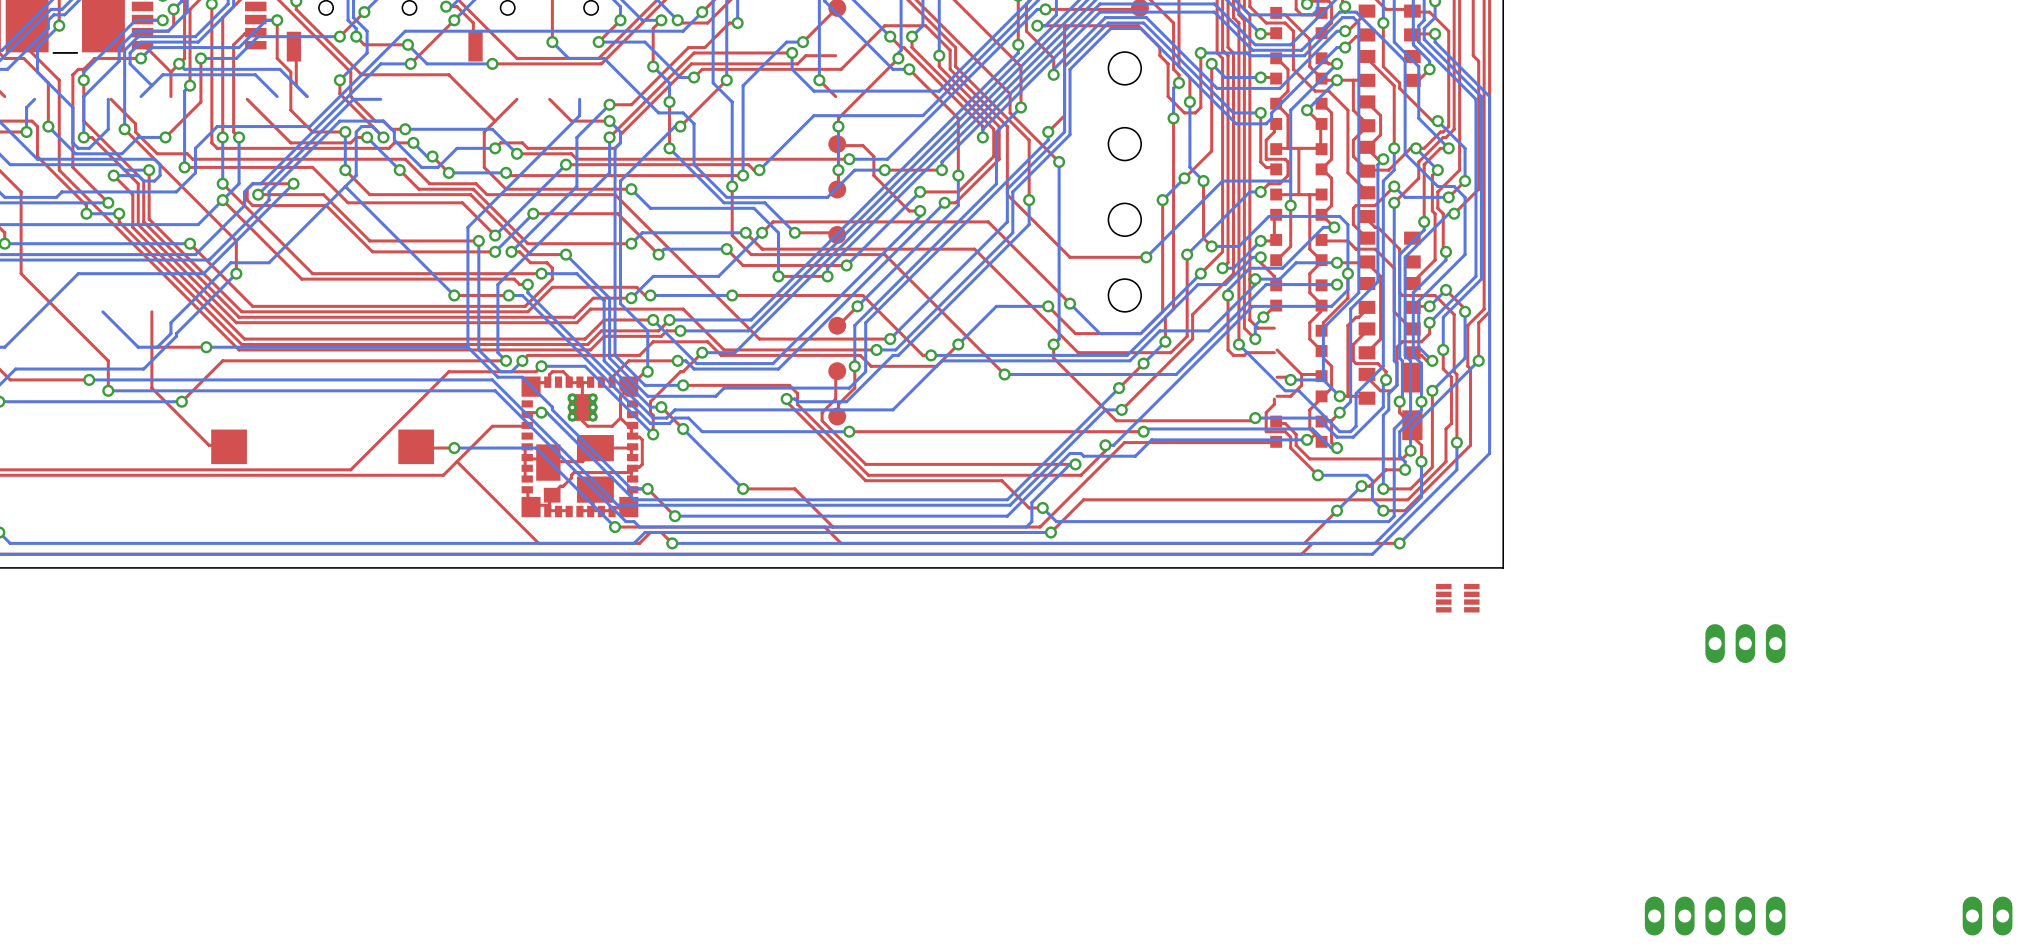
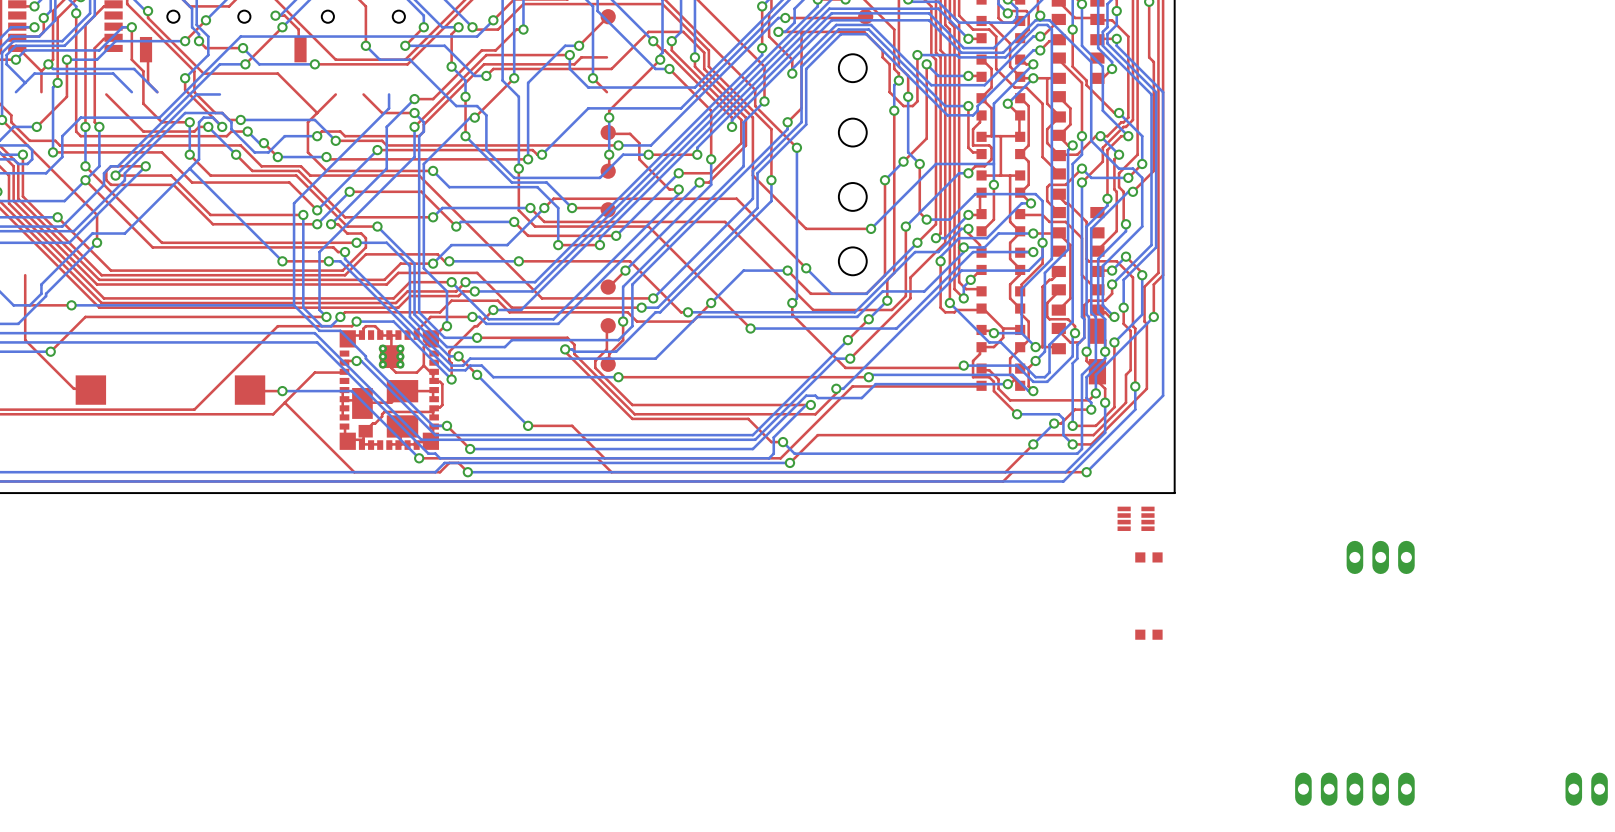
part: none -> (981, 299)
part: none -> (981, 338)
part: none -> (1148, 557)
part: none -> (1148, 634)

